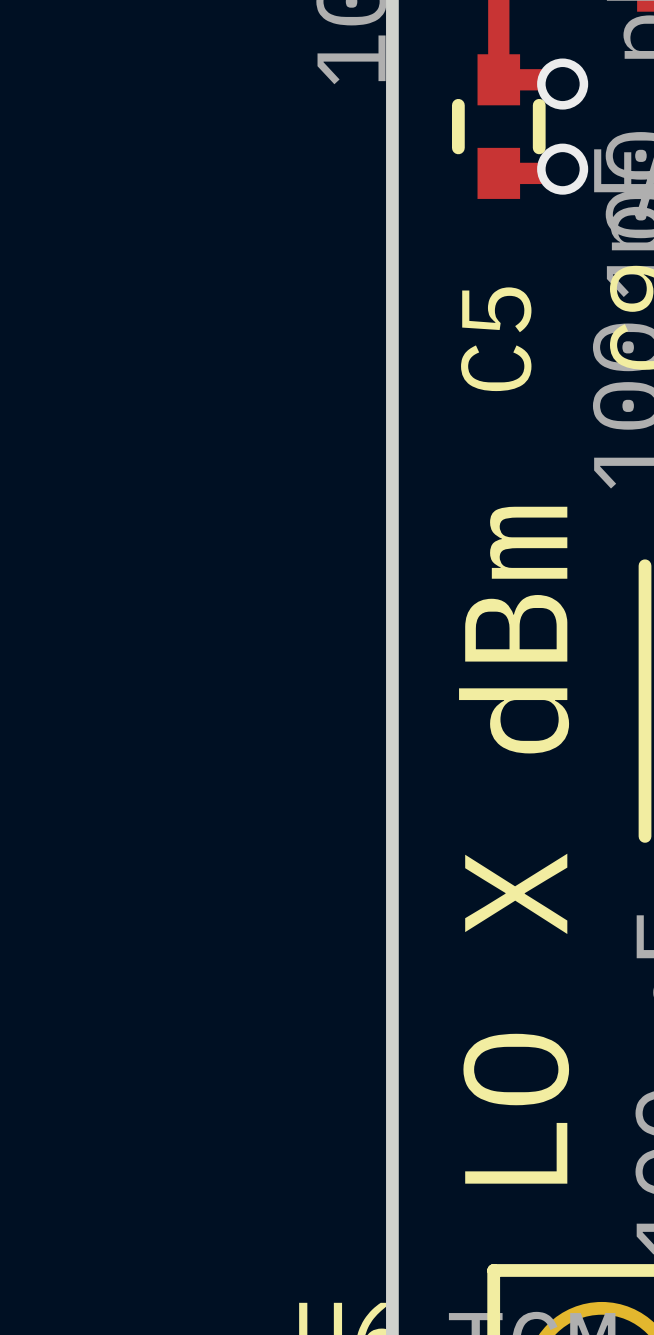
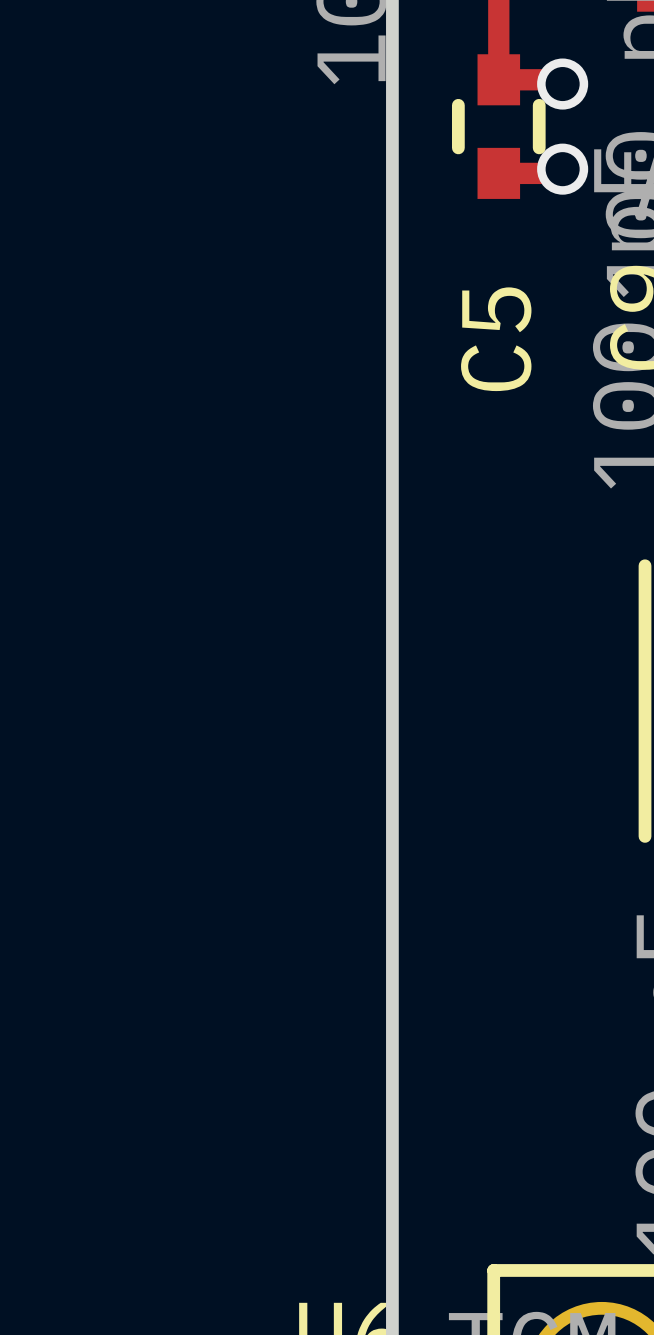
text: LO X dBm (514, 845) -> none

